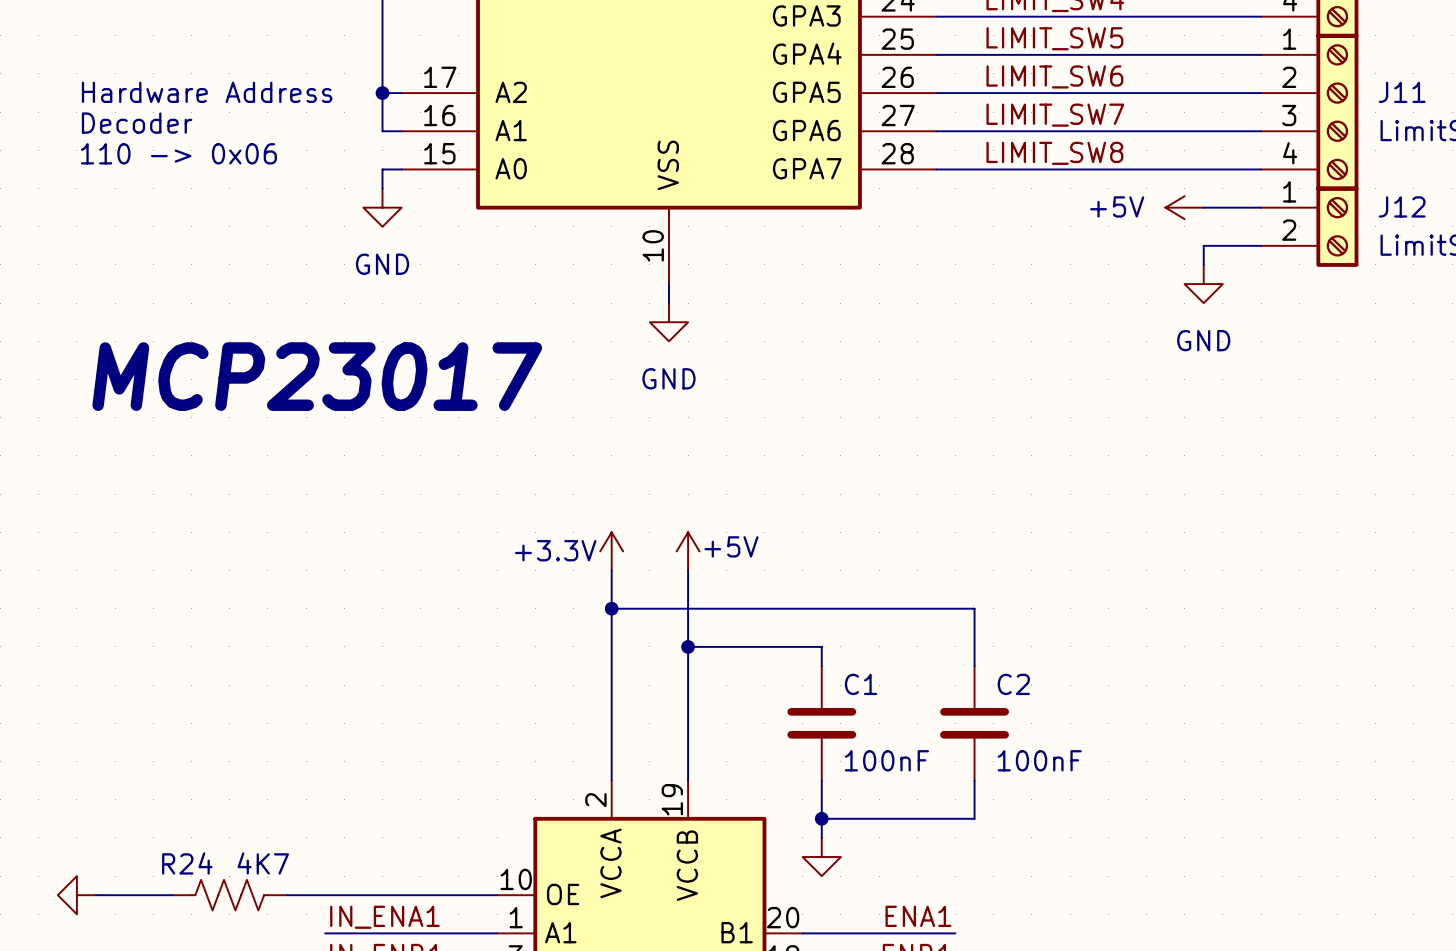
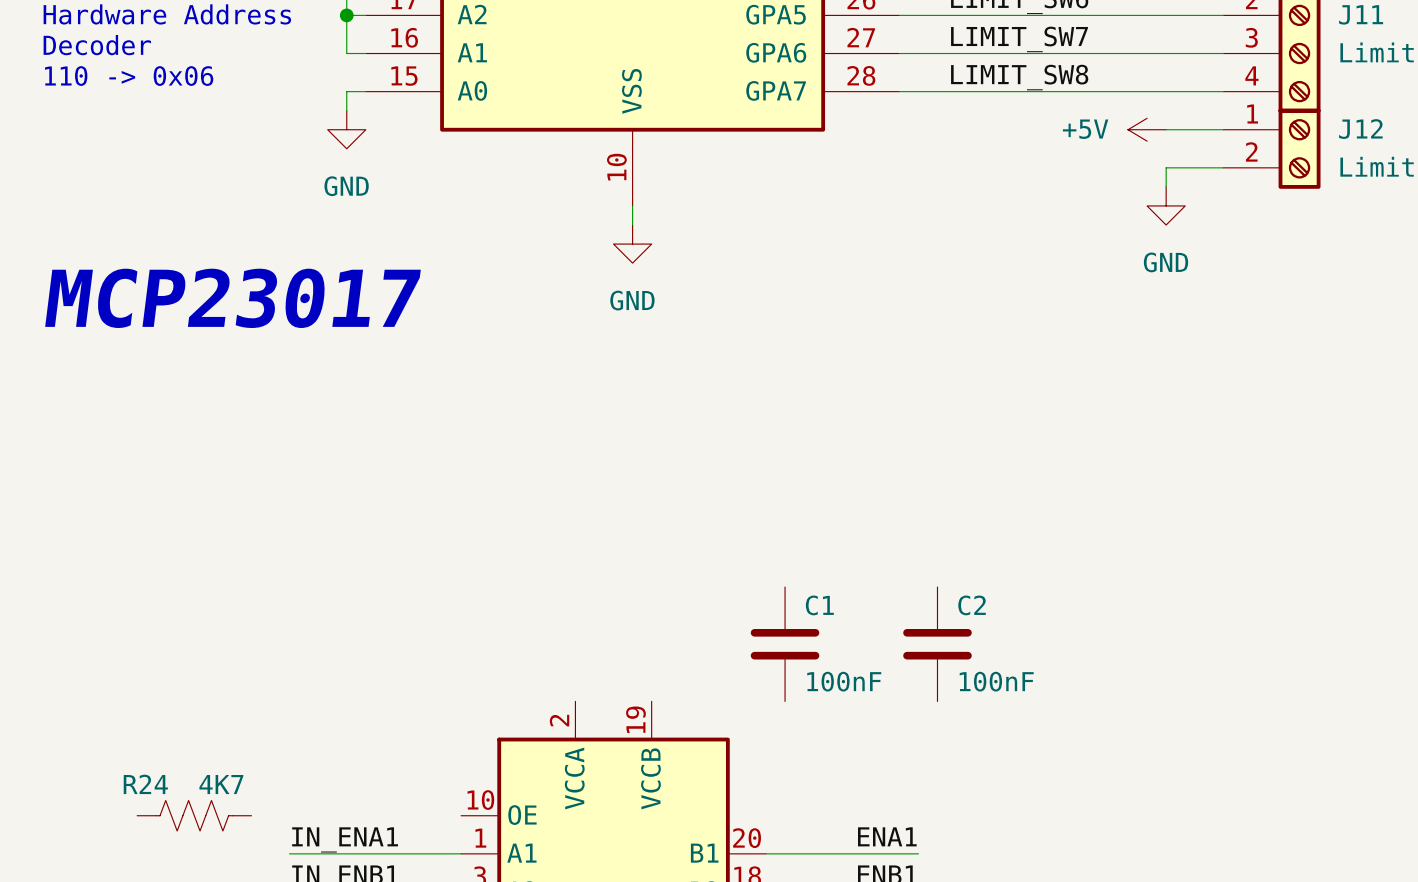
power symbol: +3.3V (611, 551) -> none
power symbol: +5V (688, 551) -> none
wire: (611, 570) (611, 780) -> none
wire: (688, 570) (688, 780) -> none
wire: (611, 608) (974, 608) (974, 666) -> none
junction: (611, 608) -> none
wire: (688, 646) (821, 646) (821, 666) -> none
junction: (688, 646) -> none
wire: (821, 780) (821, 837) -> none
wire: (974, 780) (974, 818) (821, 818) -> none
junction: (821, 818) -> none
power symbol: (821, 856) -> none
power symbol: (76, 895) -> none
wire: (96, 895) (172, 895) -> none
wire: (287, 895) (497, 895) -> none

